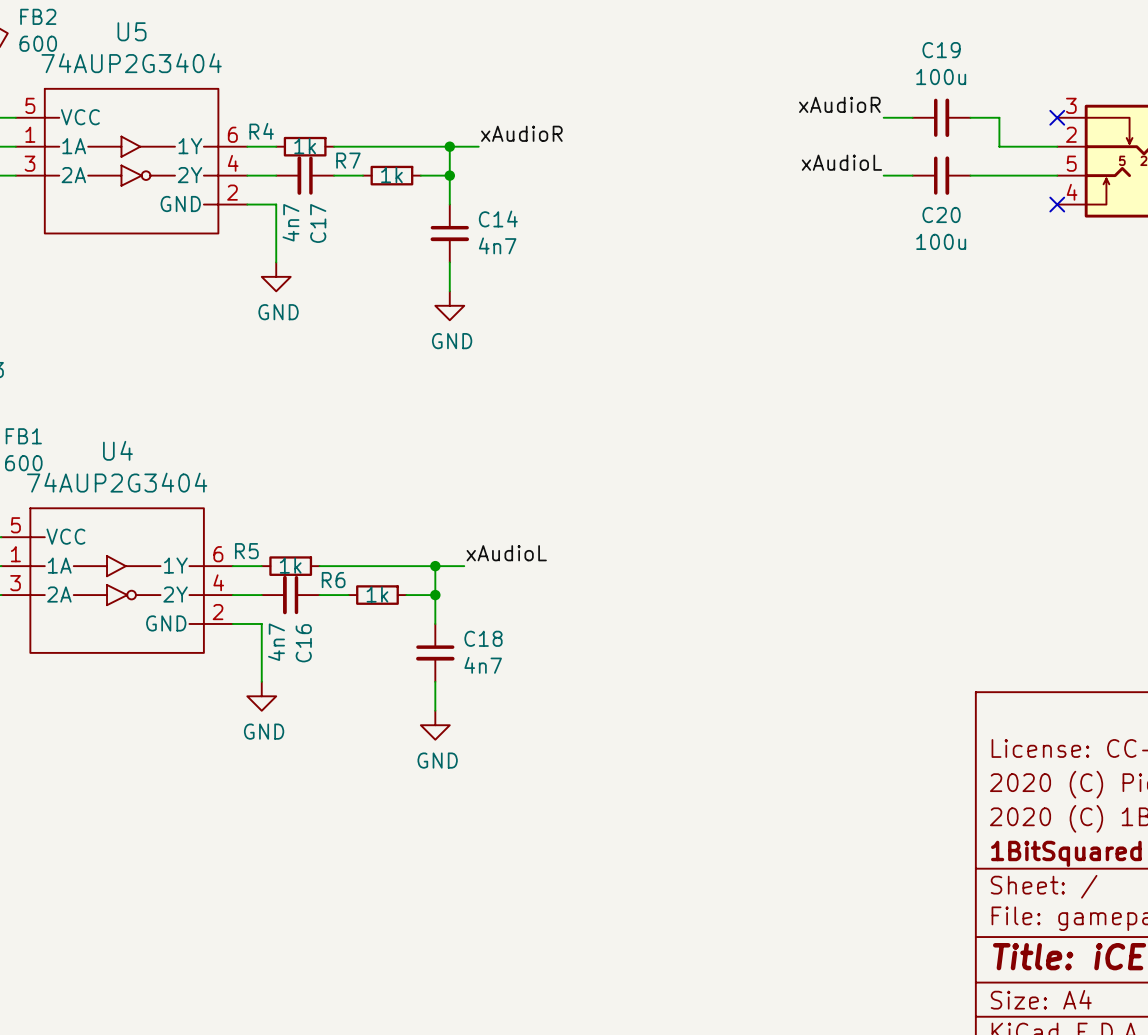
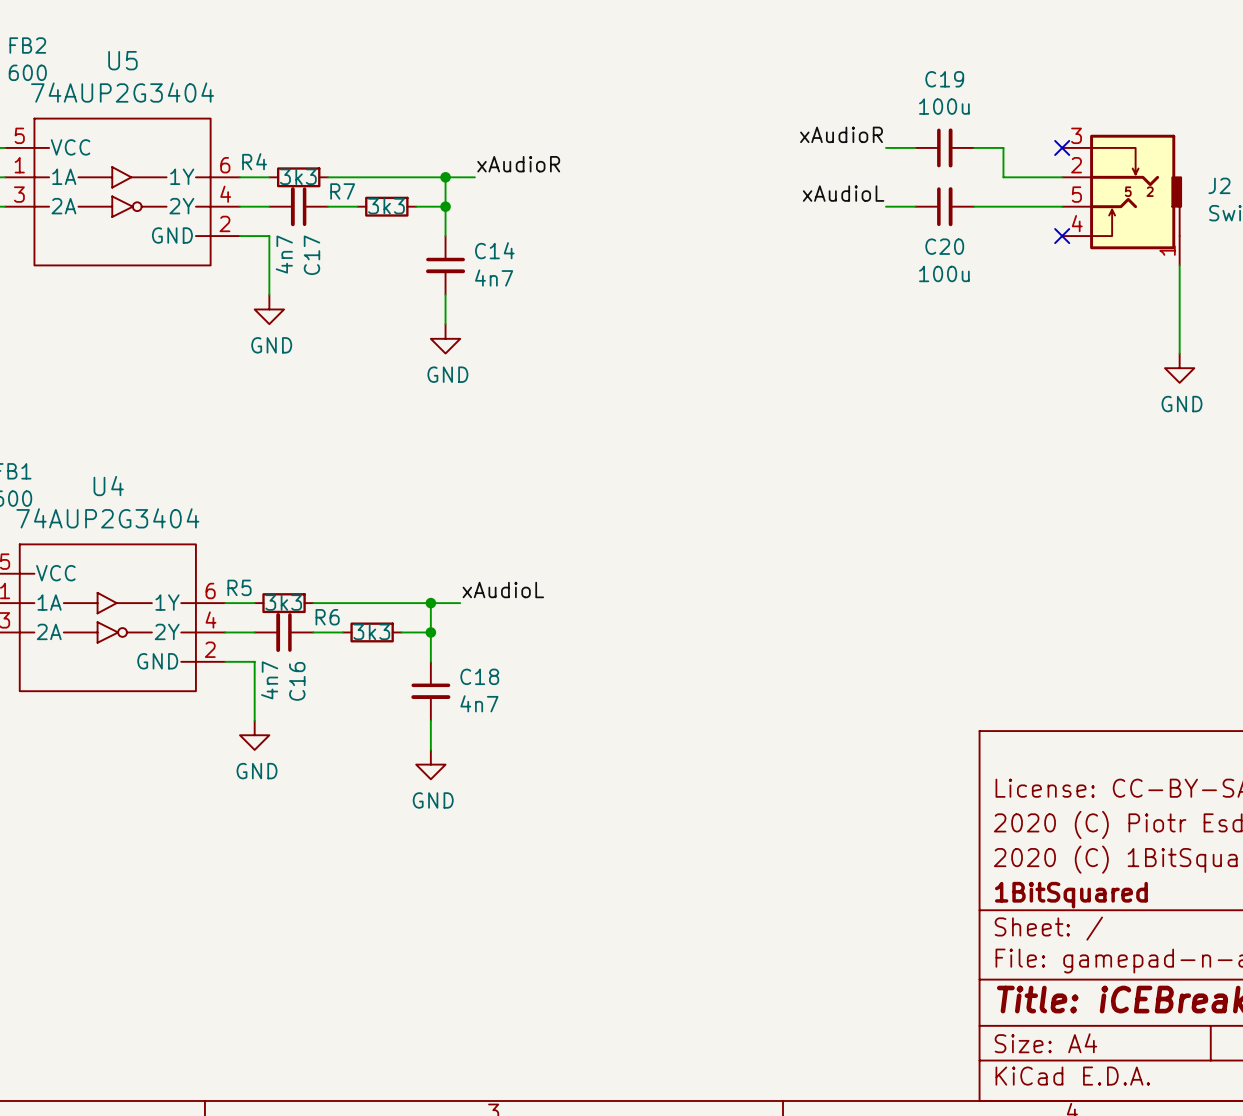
R4 value: 1k (305, 146) -> 3k3 (298, 176)
R7 value: 1k (391, 175) -> 3k3 (386, 206)
R5 value: 1k (290, 565) -> 3k3 (283, 602)
R6 value: 1k (377, 594) -> 3k3 (371, 631)

